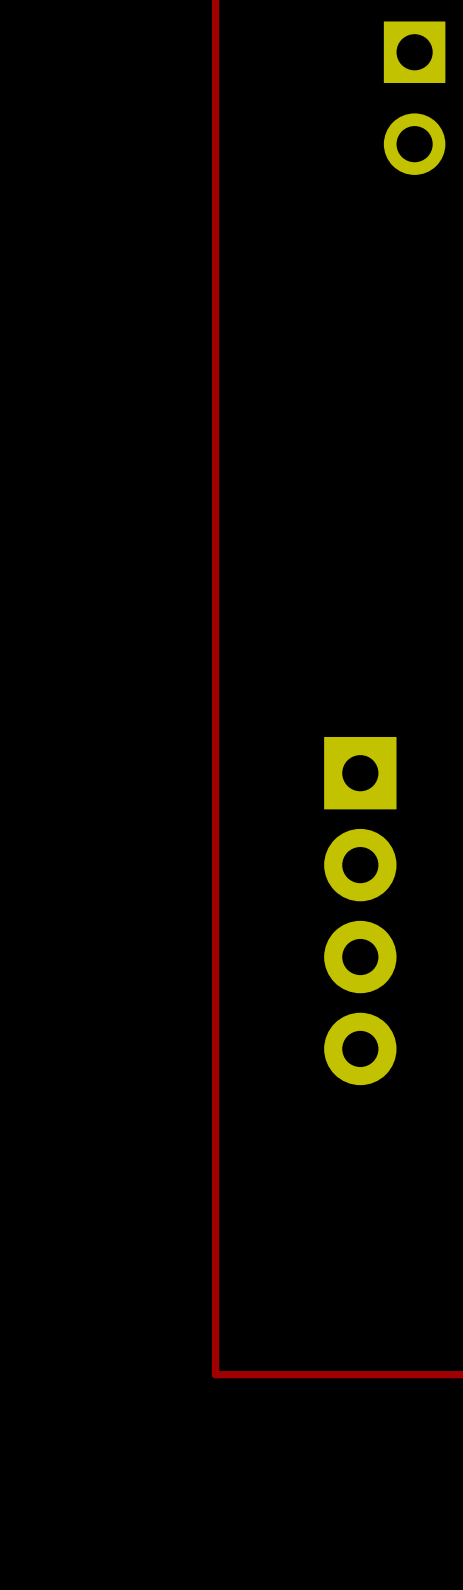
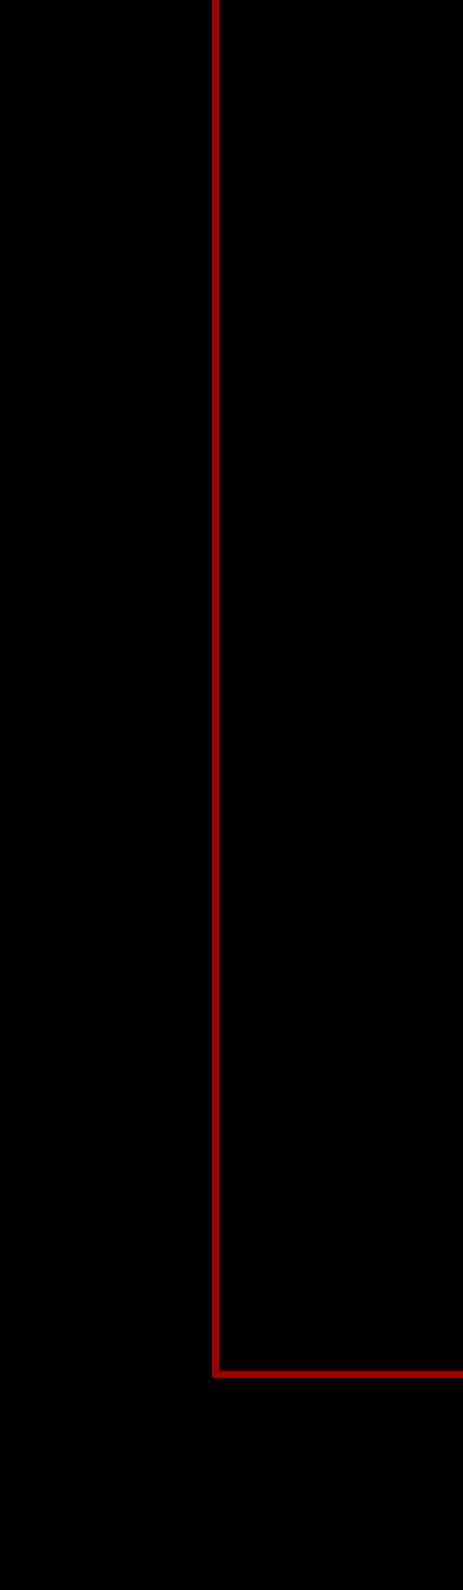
part: (414, 98) -> none
part: (360, 911) -> none

